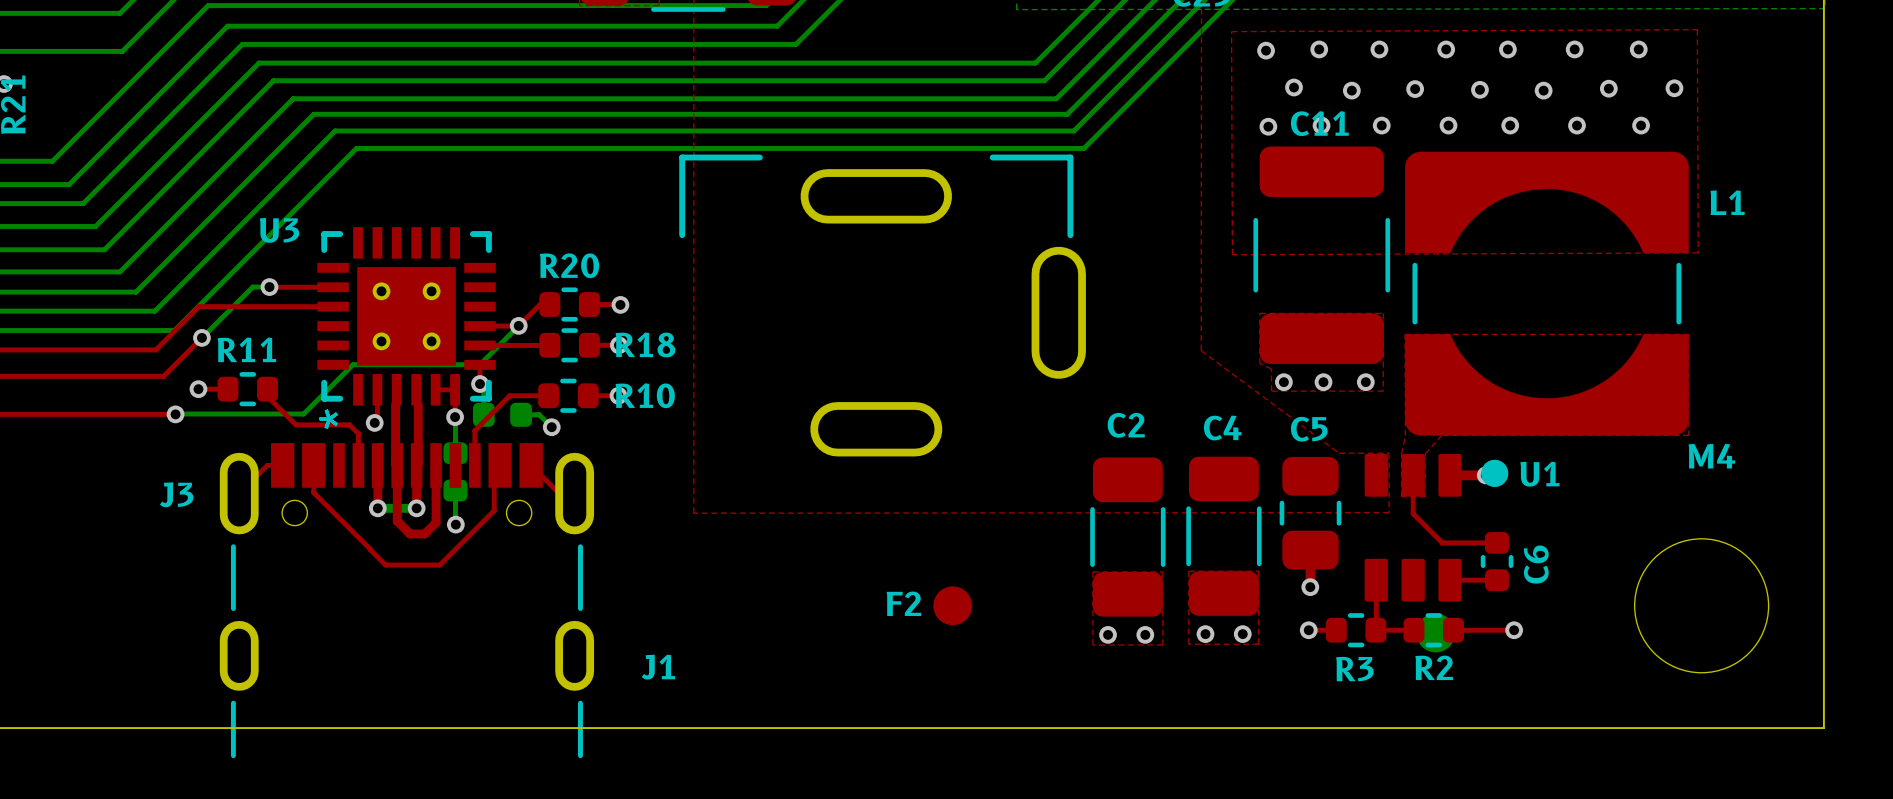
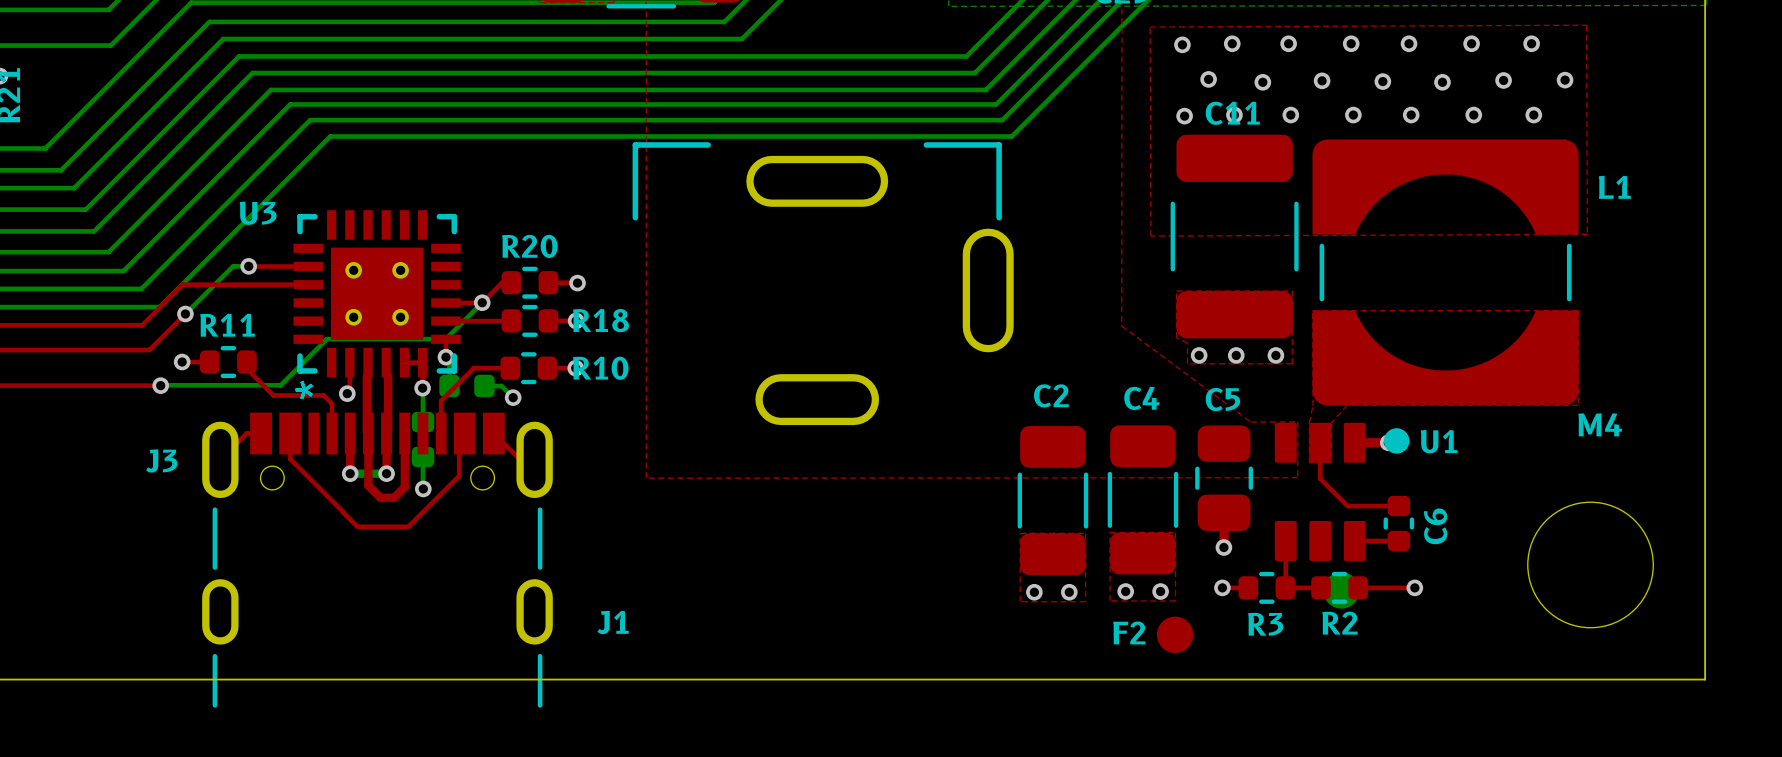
F2 position: (952, 605) -> (1175, 634)

